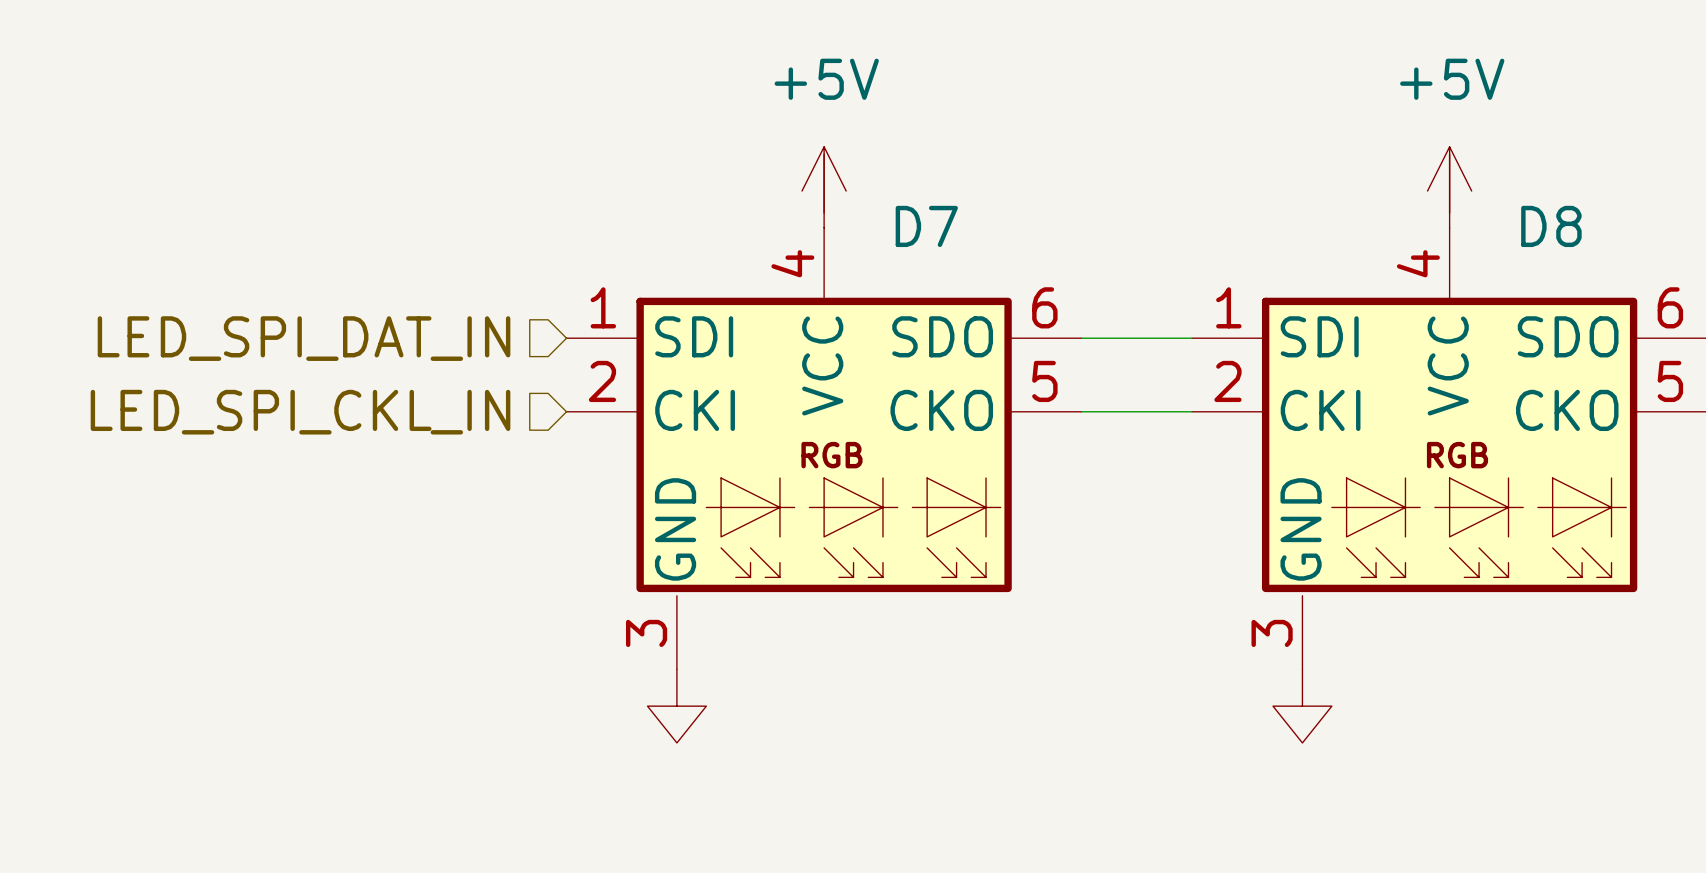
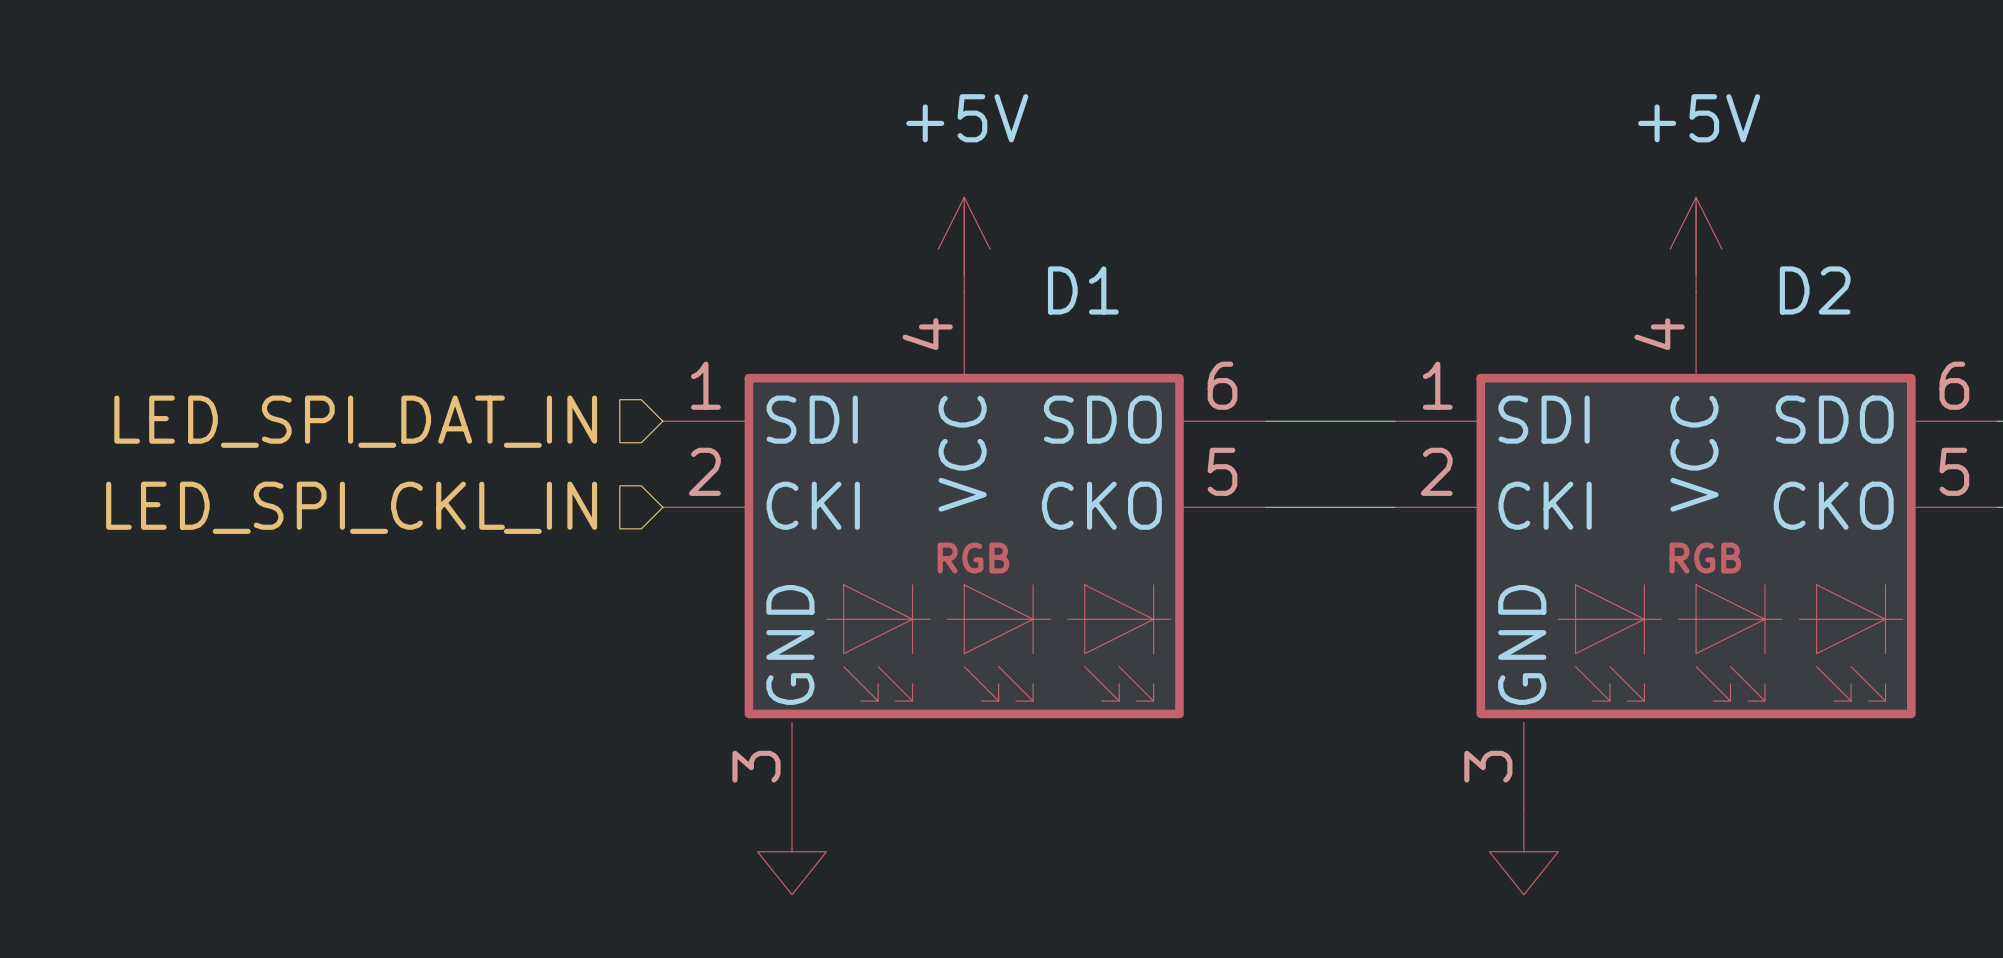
D7 name: D7 (926, 226) -> D1 (1083, 290)
D8 name: D8 (1551, 226) -> D2 (1815, 290)

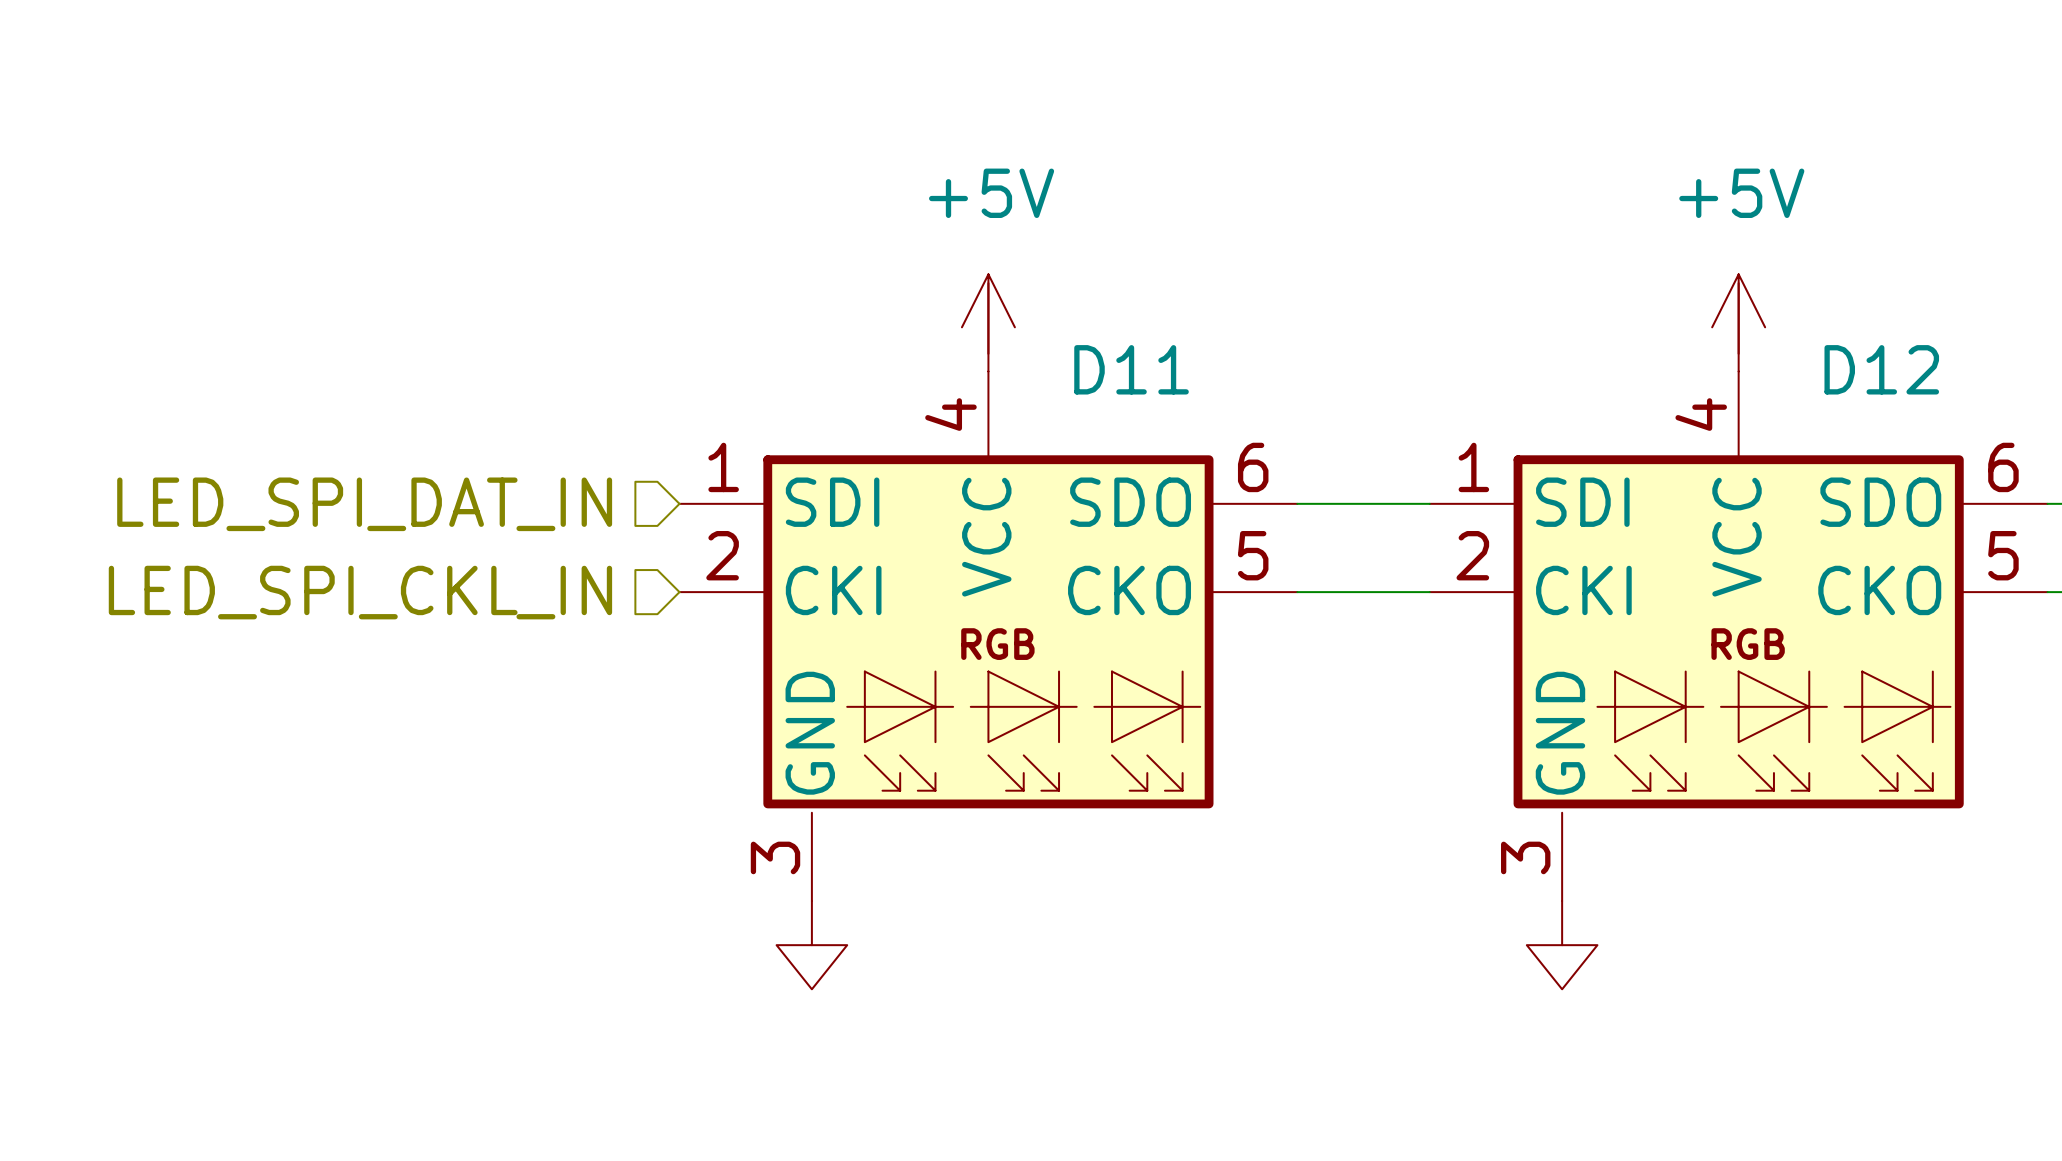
D1 name: D1 (1083, 290) -> D11 (1131, 369)
D2 name: D2 (1815, 290) -> D12 (1881, 369)

